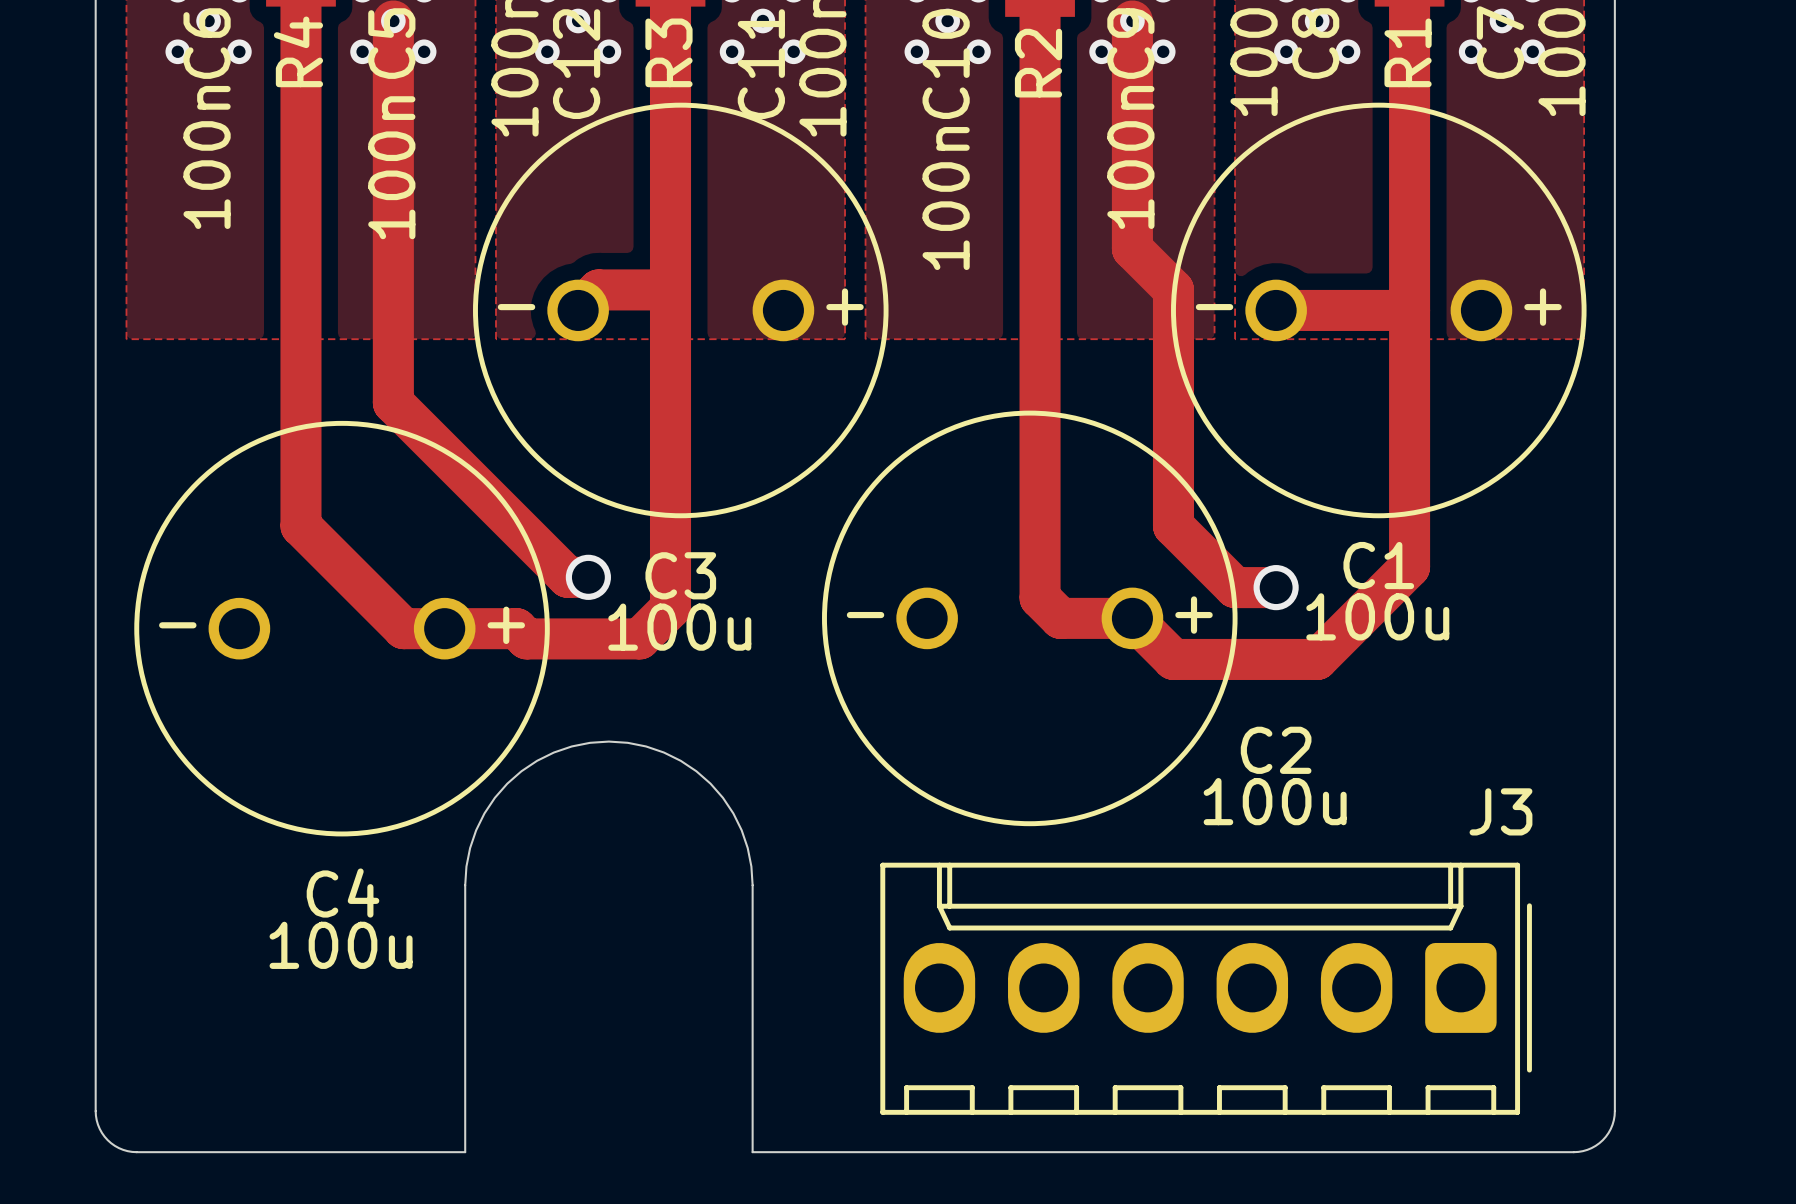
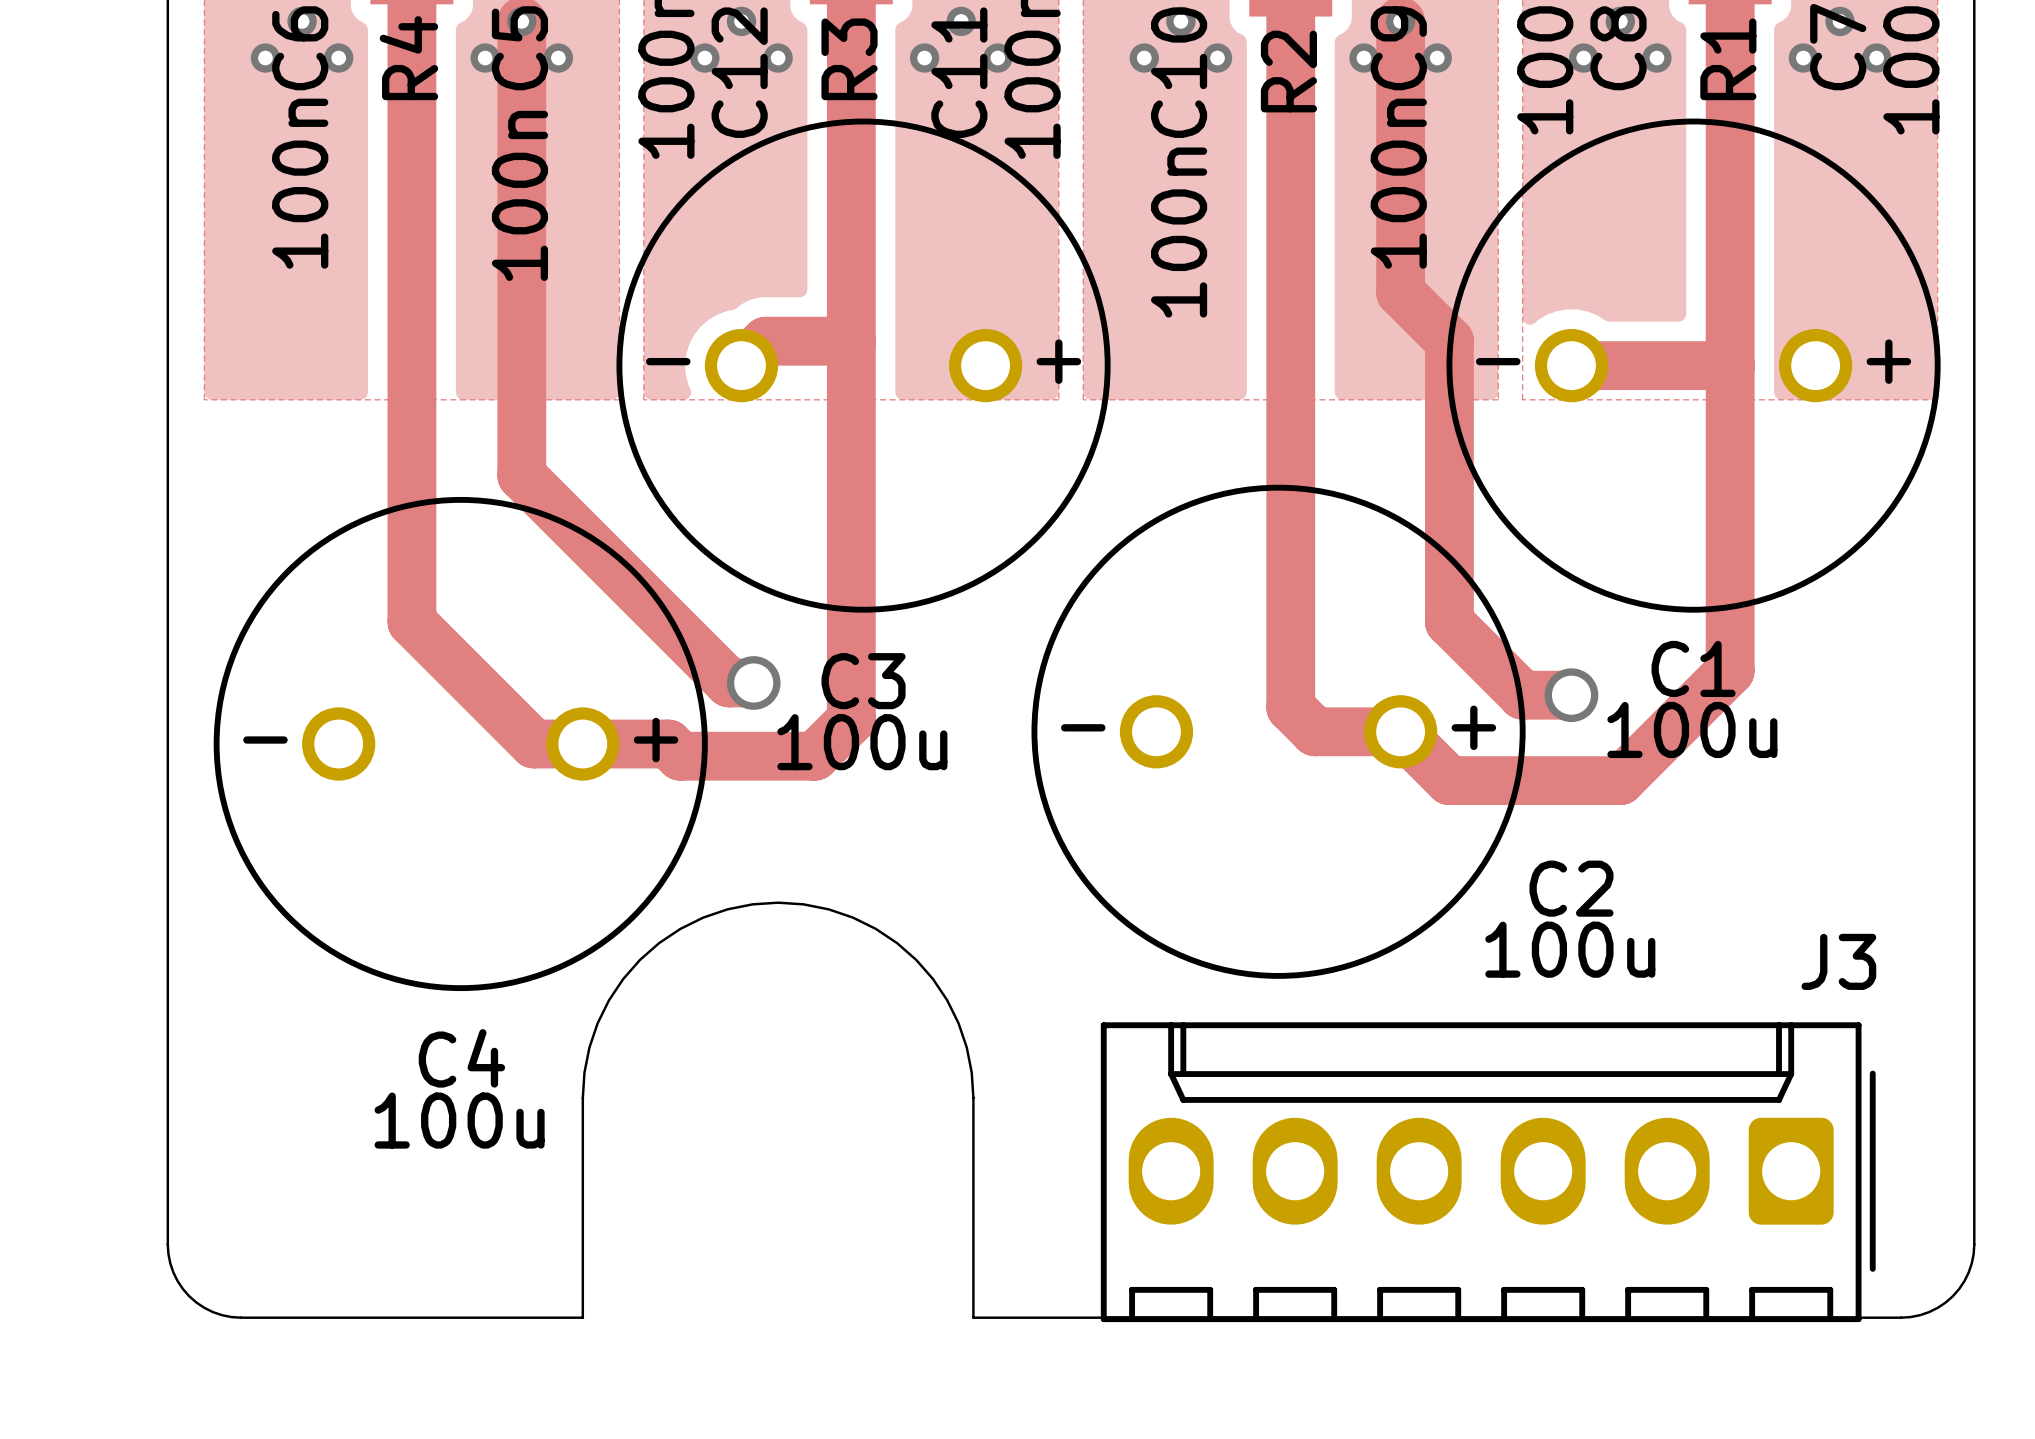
board edge: (95, 1049) (95, 1111) (97, 1124) (107, 1140) (114, 1145) (127, 1151) (465, 1152) (465, 885) (470, 848) (476, 830) (494, 797) (521, 771) (537, 760) (571, 746) (608, 741) (646, 746) (680, 760) (696, 771) (722, 797) (741, 830) (747, 848) (752, 885) (752, 1152) (1578, 1151) (1591, 1148) (1599, 1143) (1605, 1136) (1612, 1124) (1614, 1111) (1614, 1049) -> (167, 1244) (170, 1263) (182, 1289) (204, 1307) (231, 1317) (582, 1317) (582, 1097) (584, 1072) (589, 1047) (597, 1023) (608, 1000) (623, 979) (640, 959) (659, 943) (680, 928) (703, 917) (727, 909) (752, 904) (778, 902) (803, 904) (828, 909) (852, 917) (875, 928) (896, 943) (916, 959) (933, 979) (947, 1000) (958, 1023) (966, 1047) (971, 1072) (973, 1097) (973, 1317) (1910, 1317) (1929, 1312) (1952, 1296) (1968, 1272) (1974, 1244)

